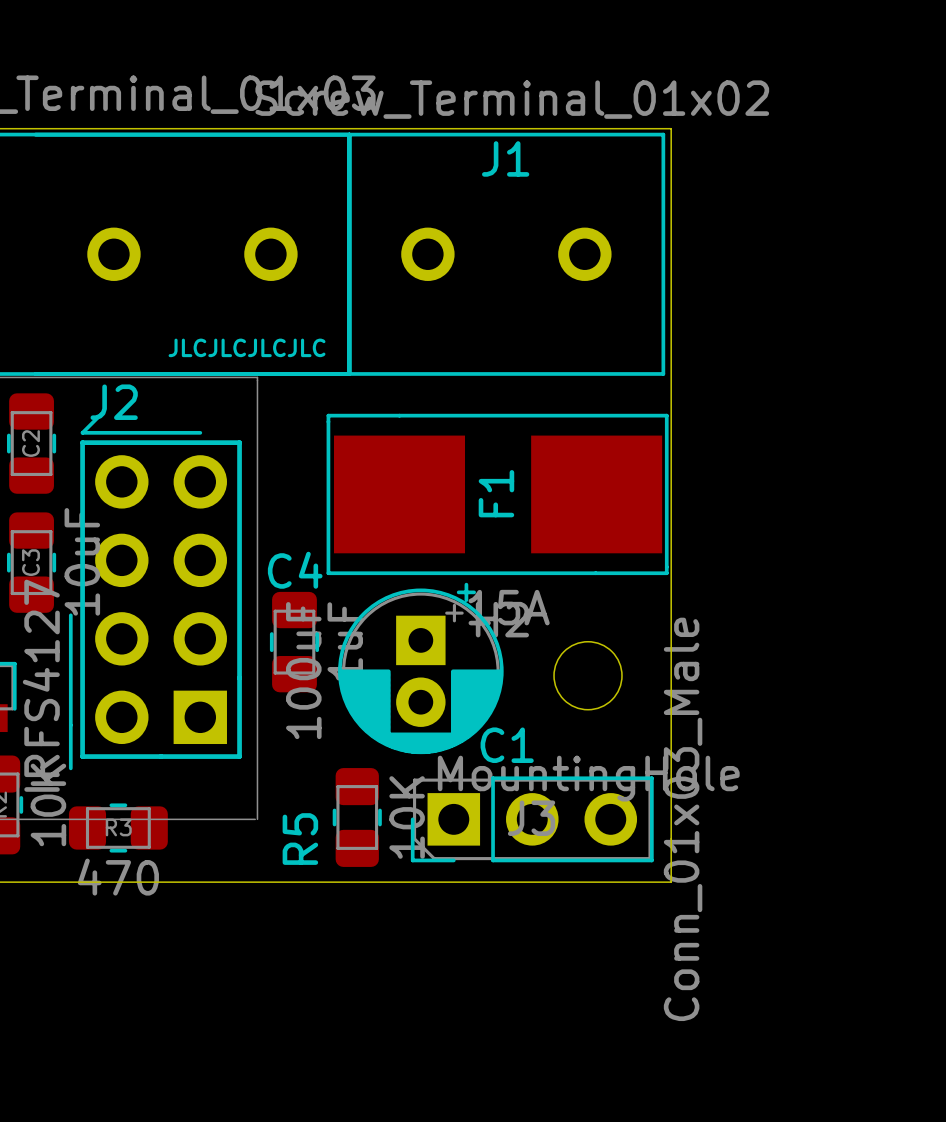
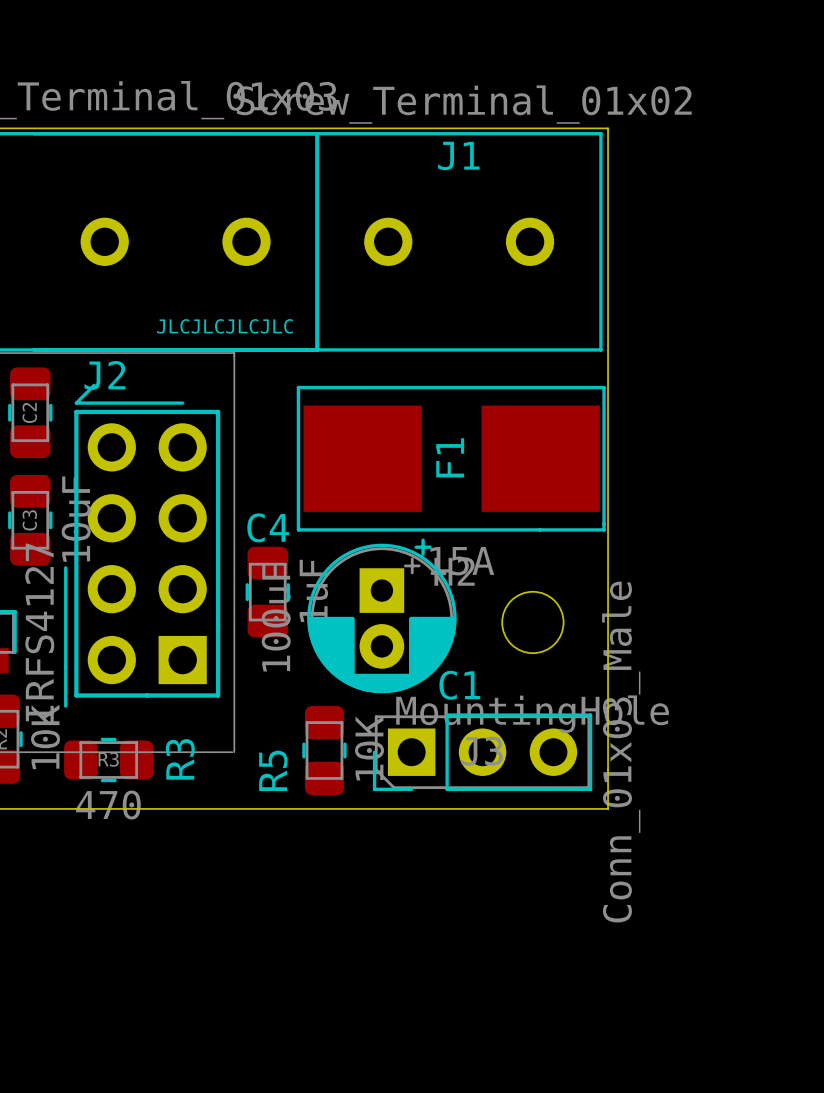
text: none -> R3 (180, 759)

